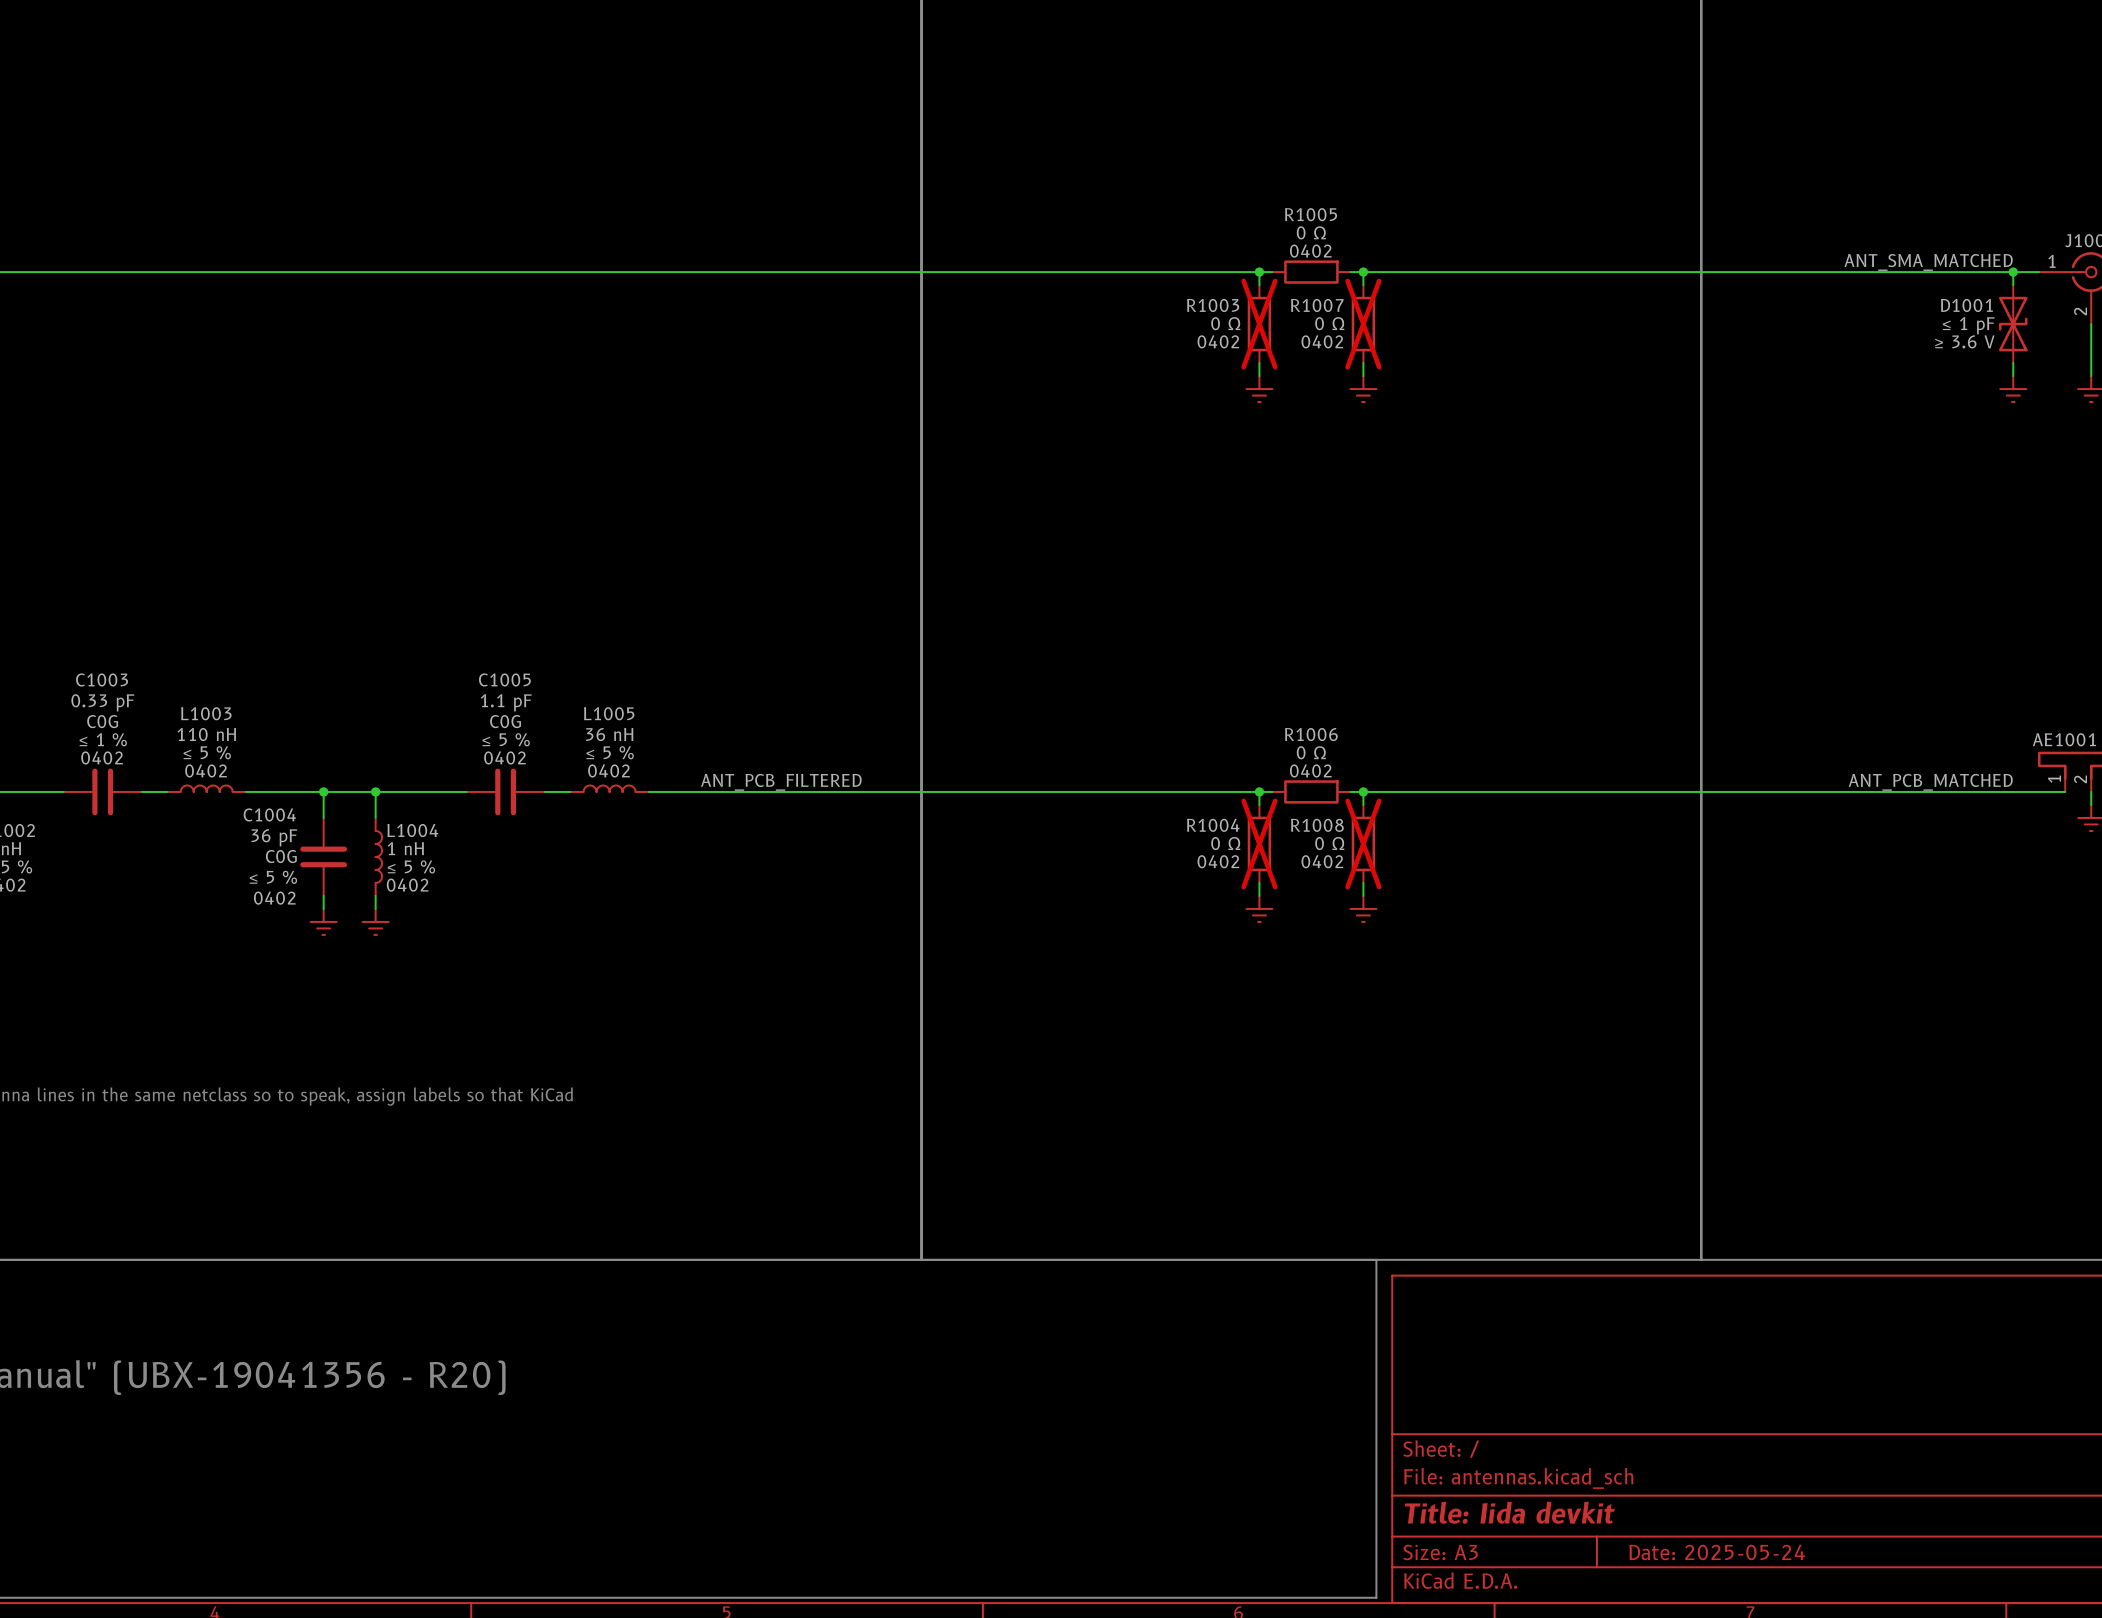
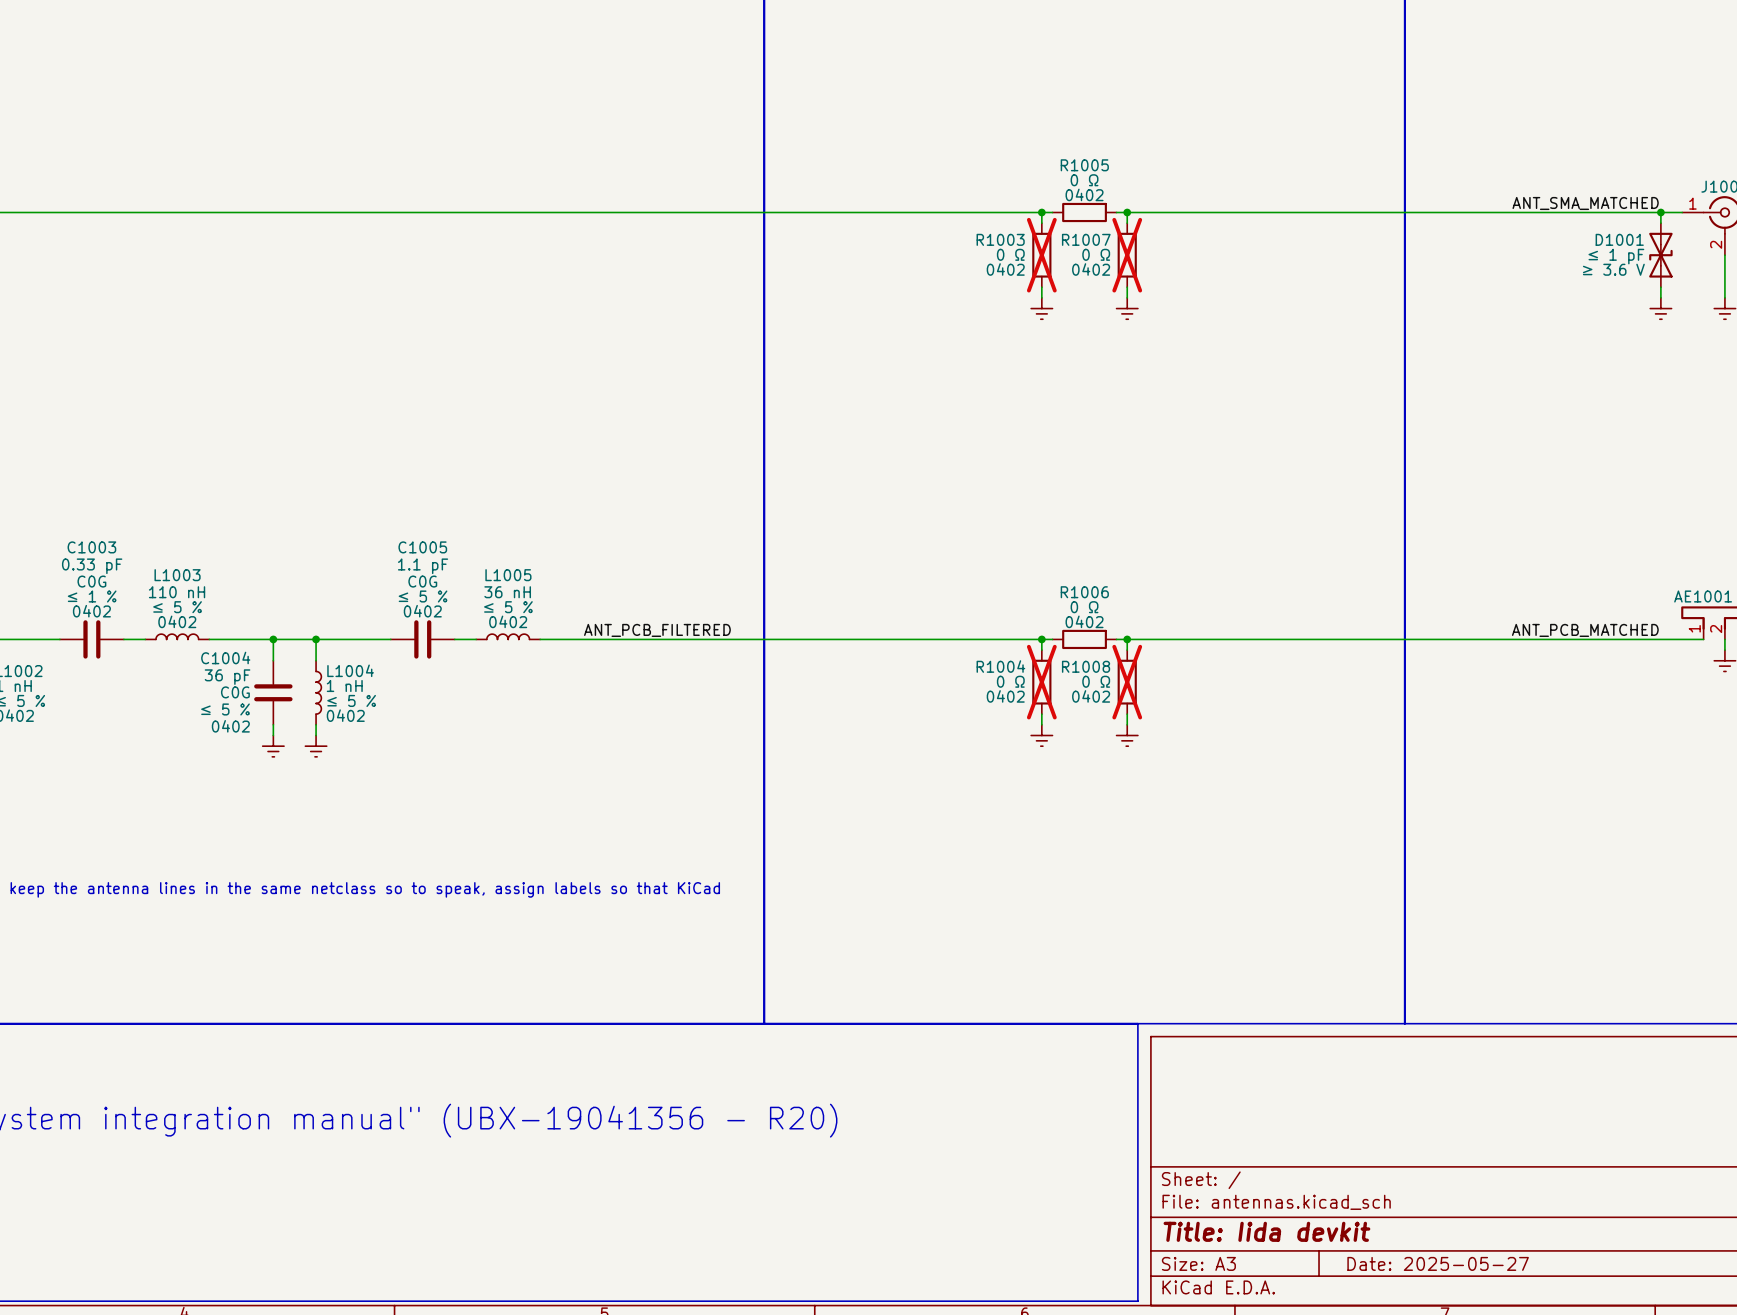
title block: Date: 2025-05-24 (1717, 1552) -> Date: 2025-05-27 (1438, 1263)

